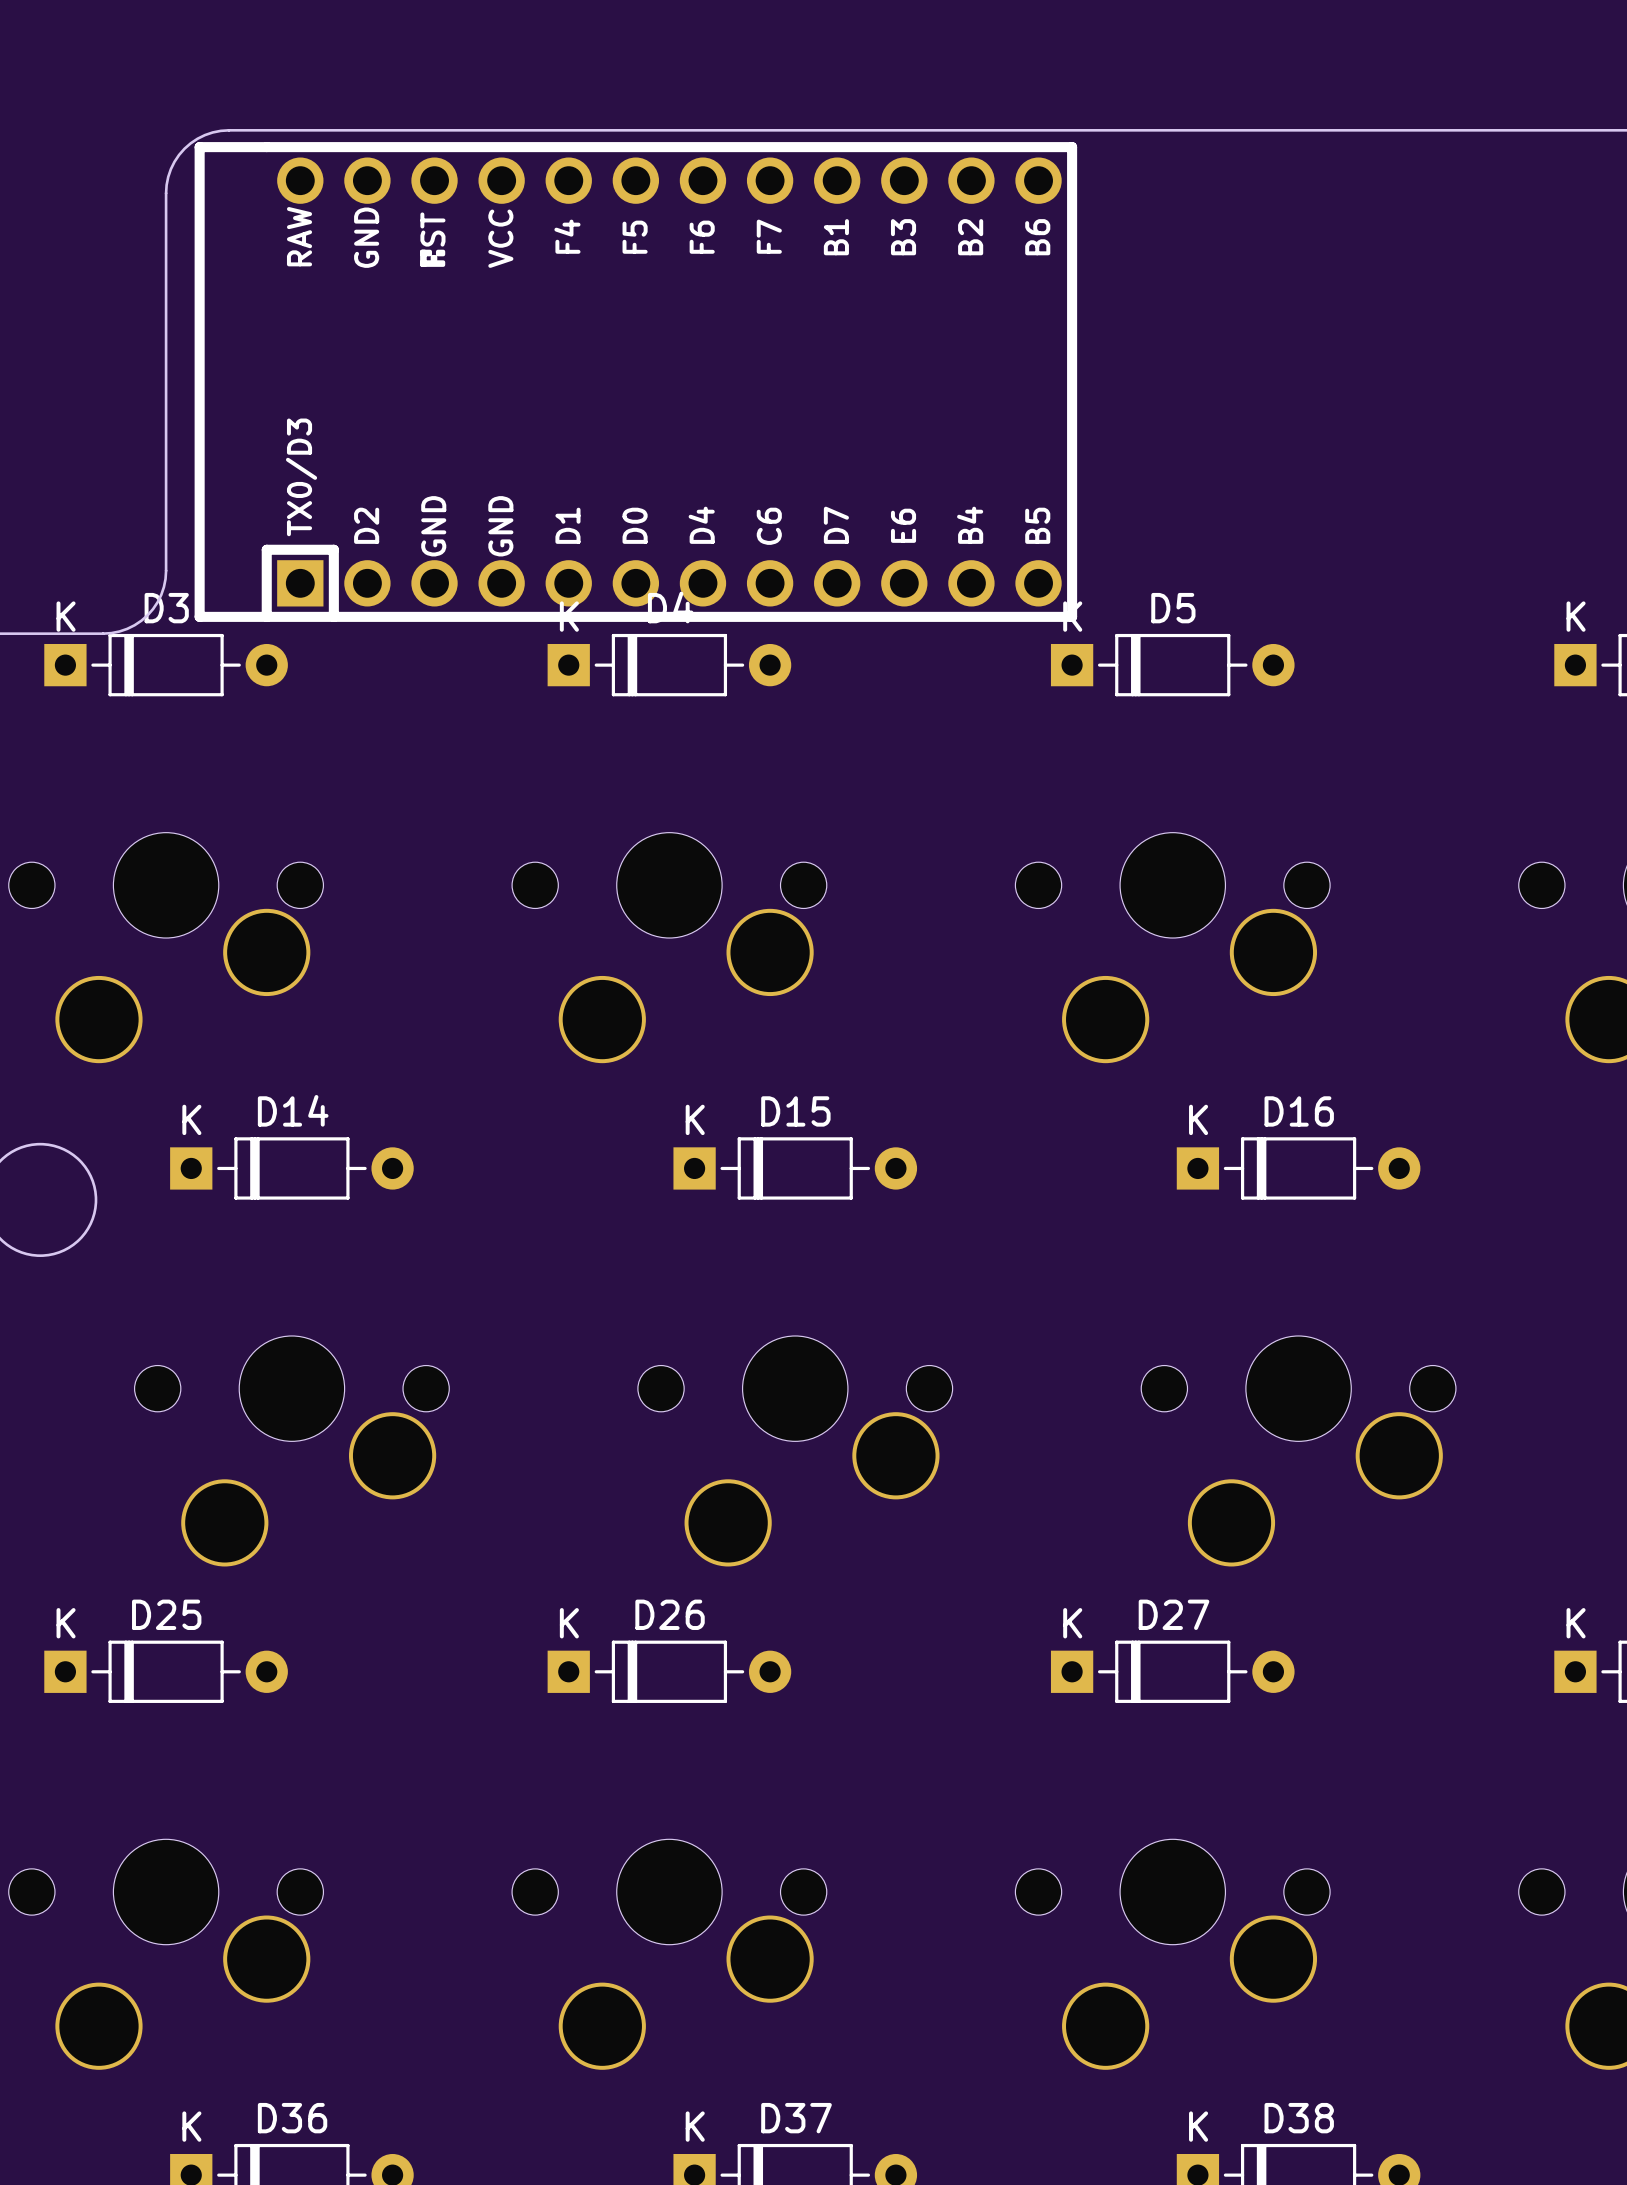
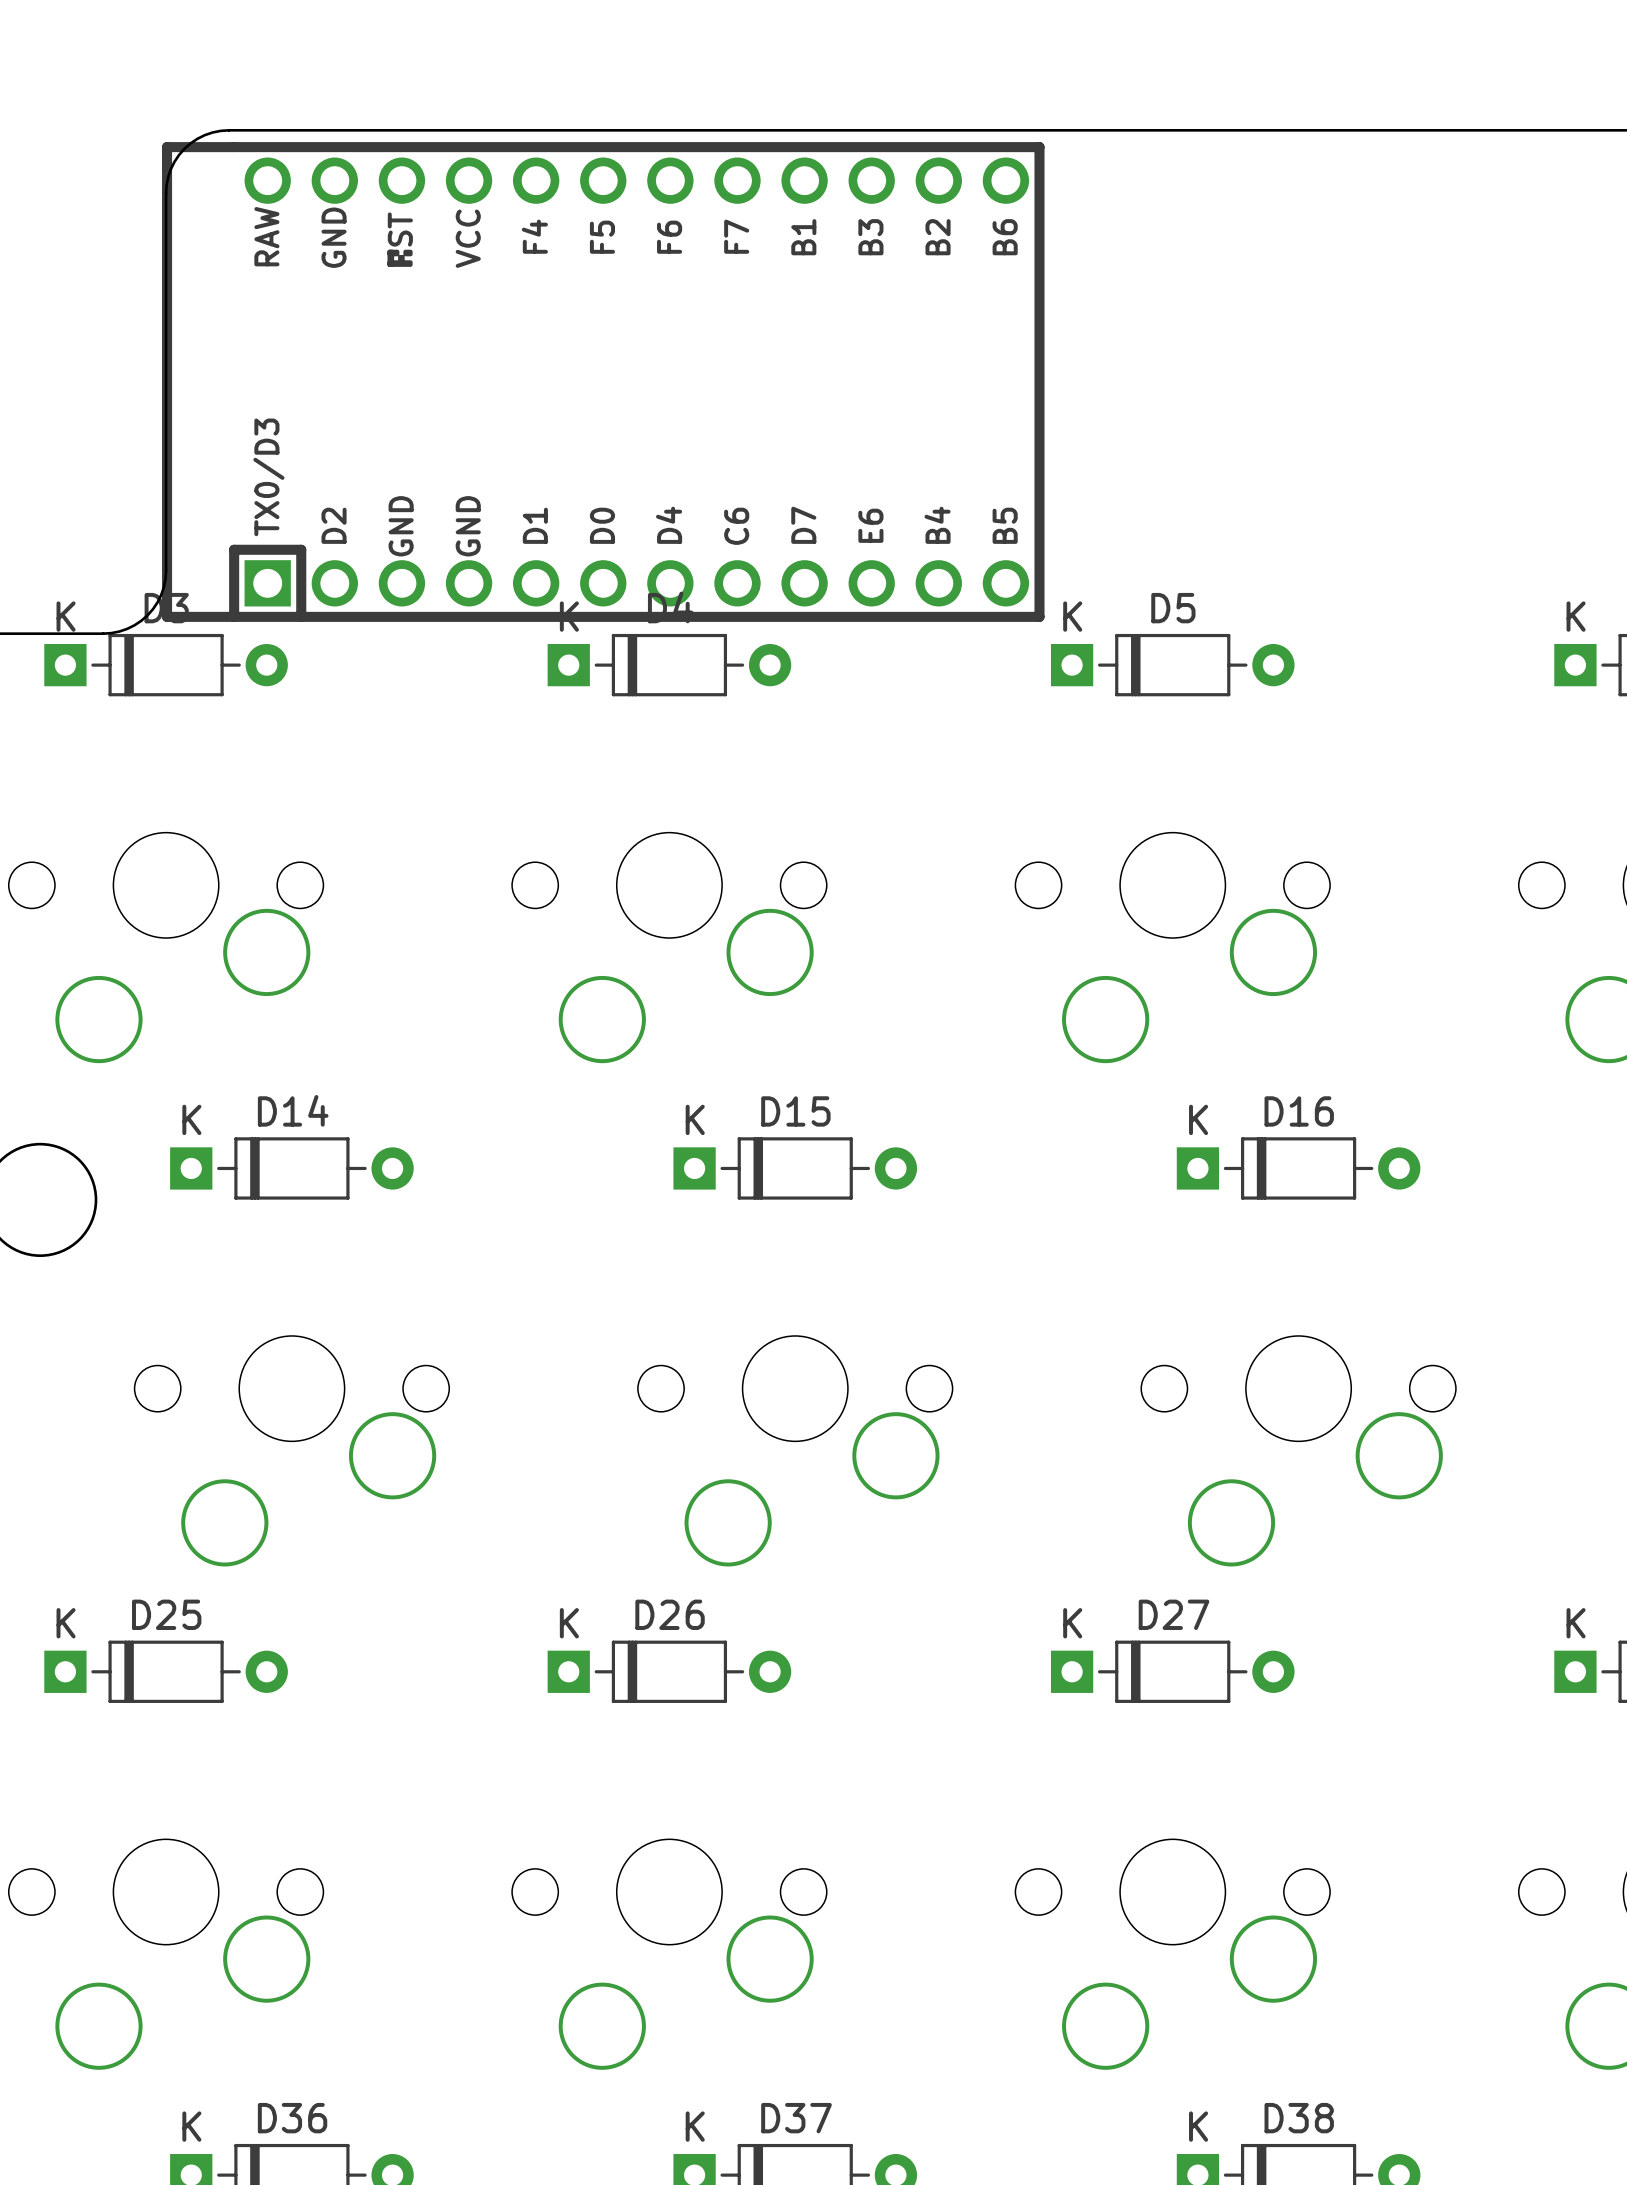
part position: (635, 381) -> (603, 381)

